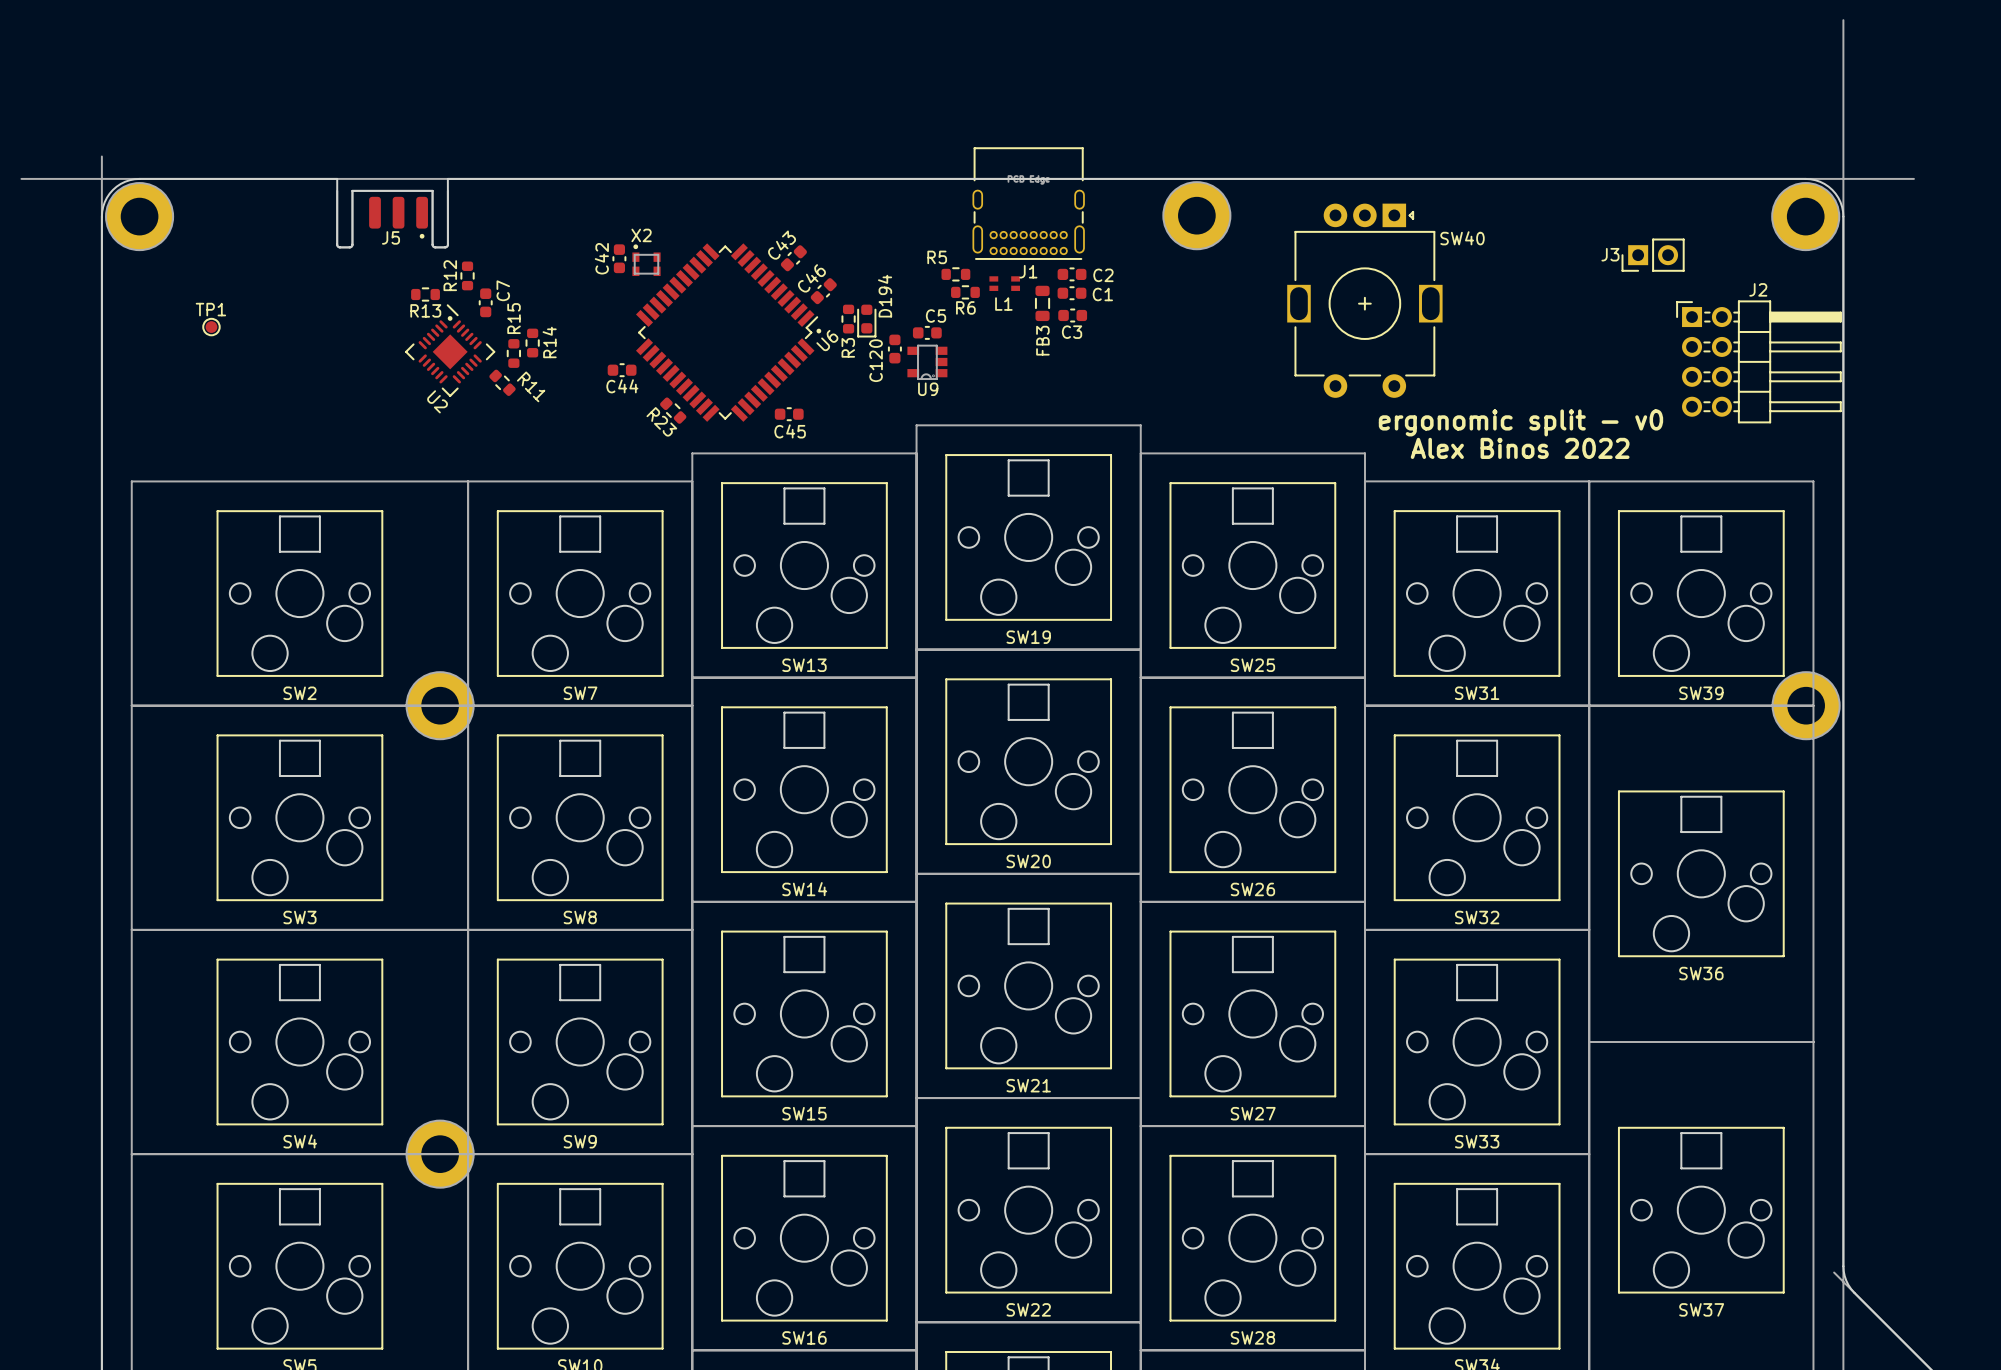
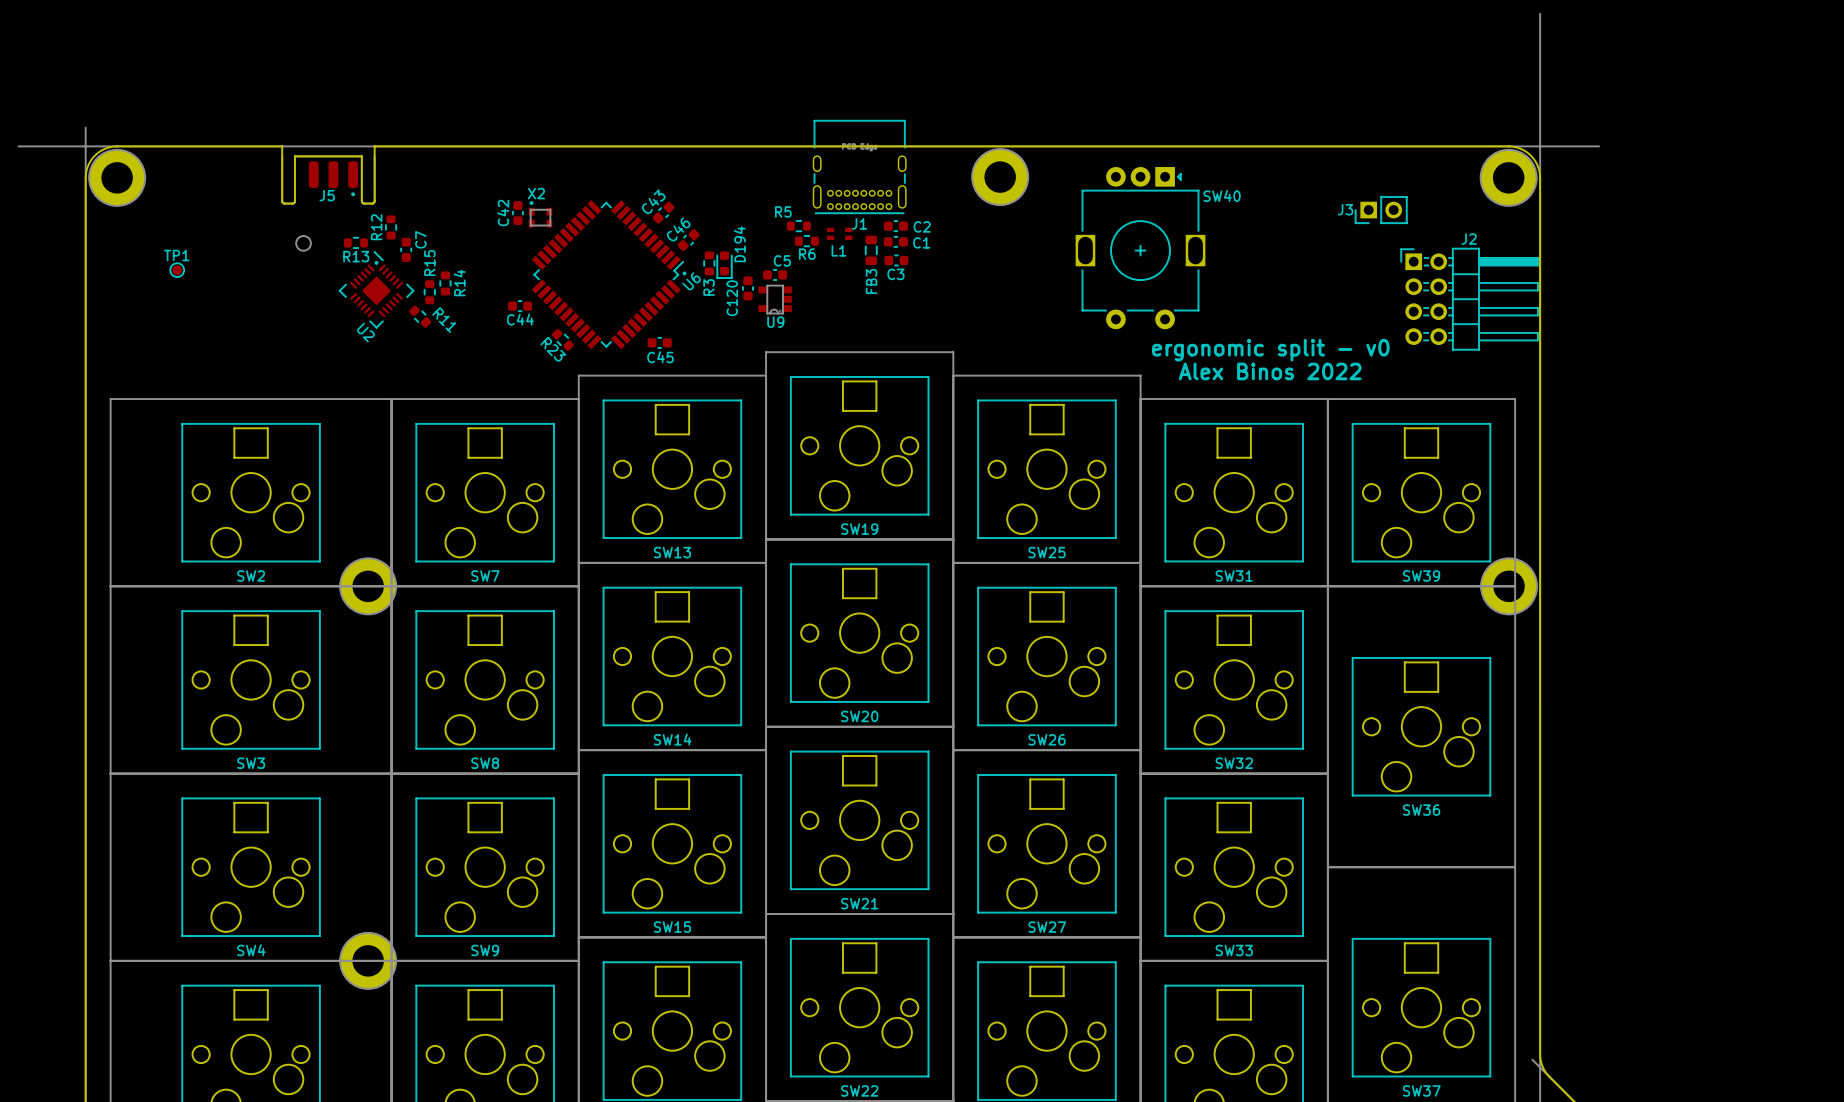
drawing: none -> [295, 235, 312, 252]

